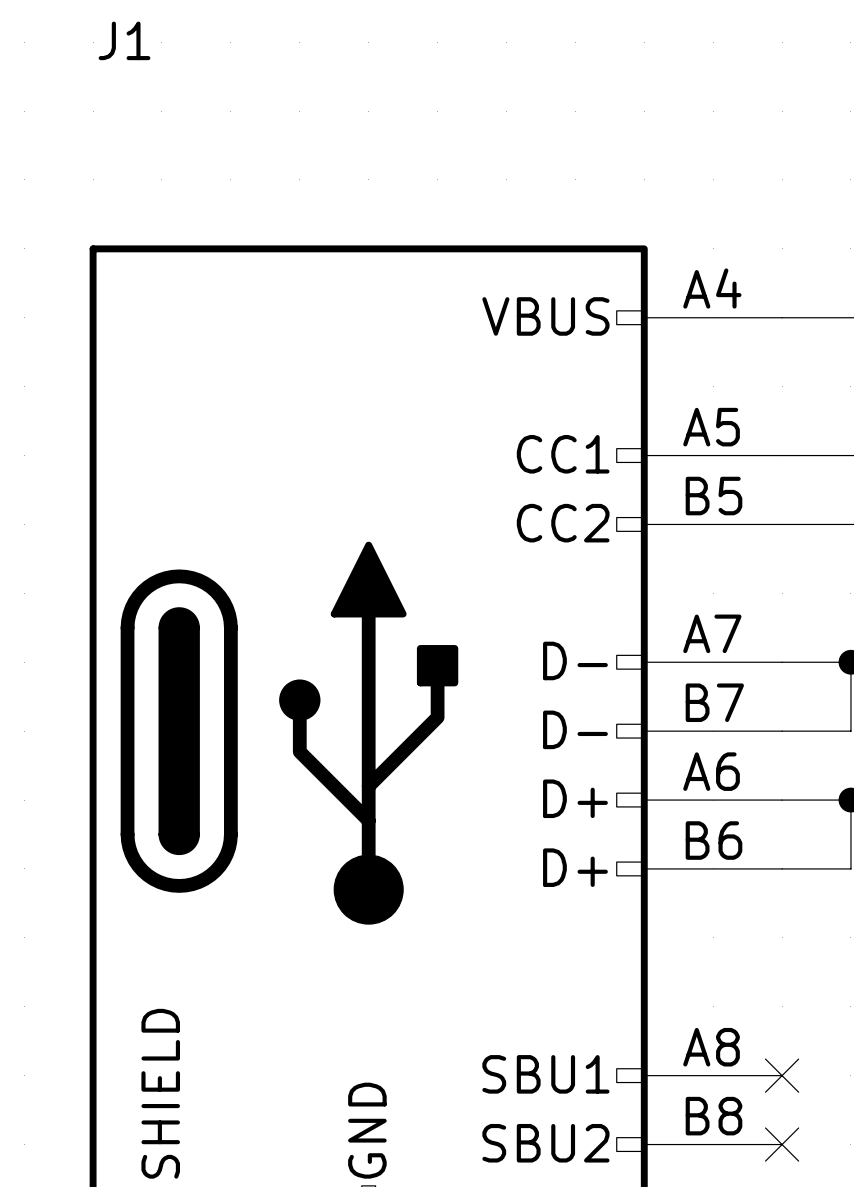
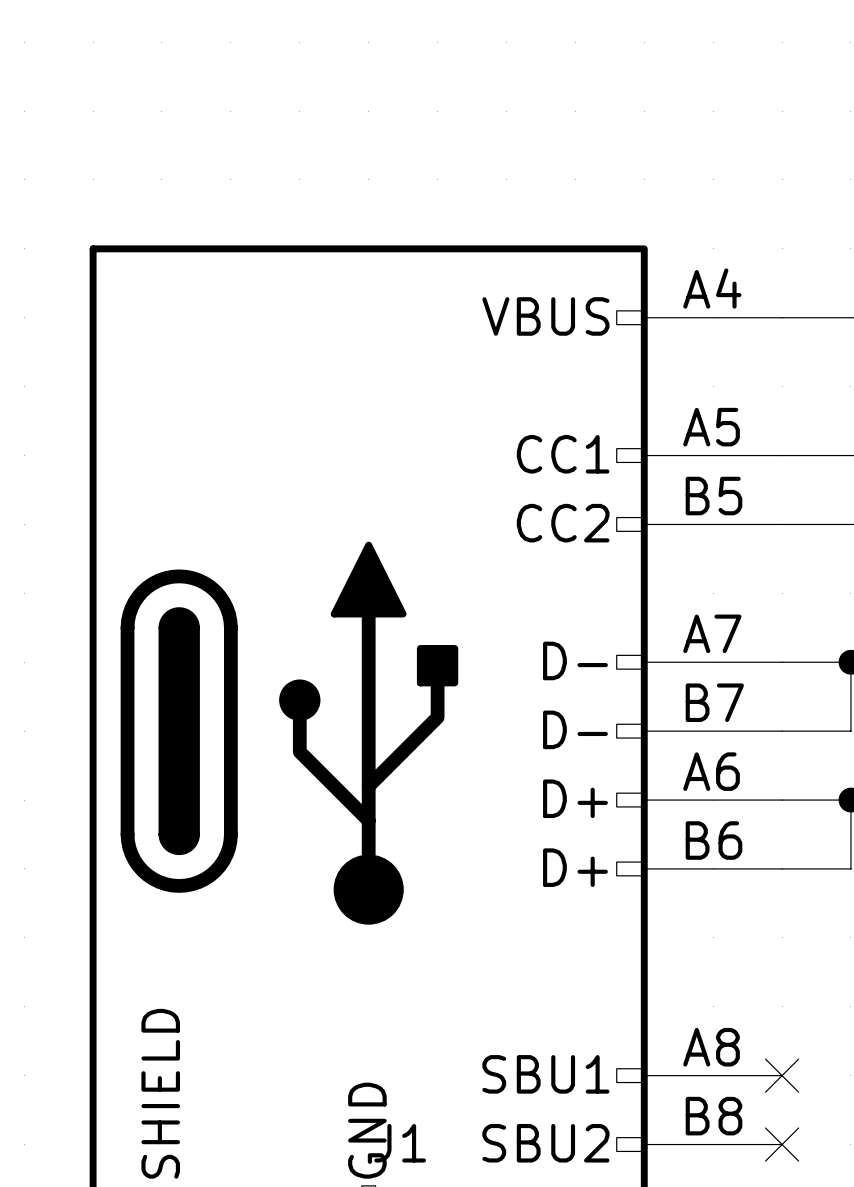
J1 name position: J1 (124, 40) -> J1 (400, 1143)

